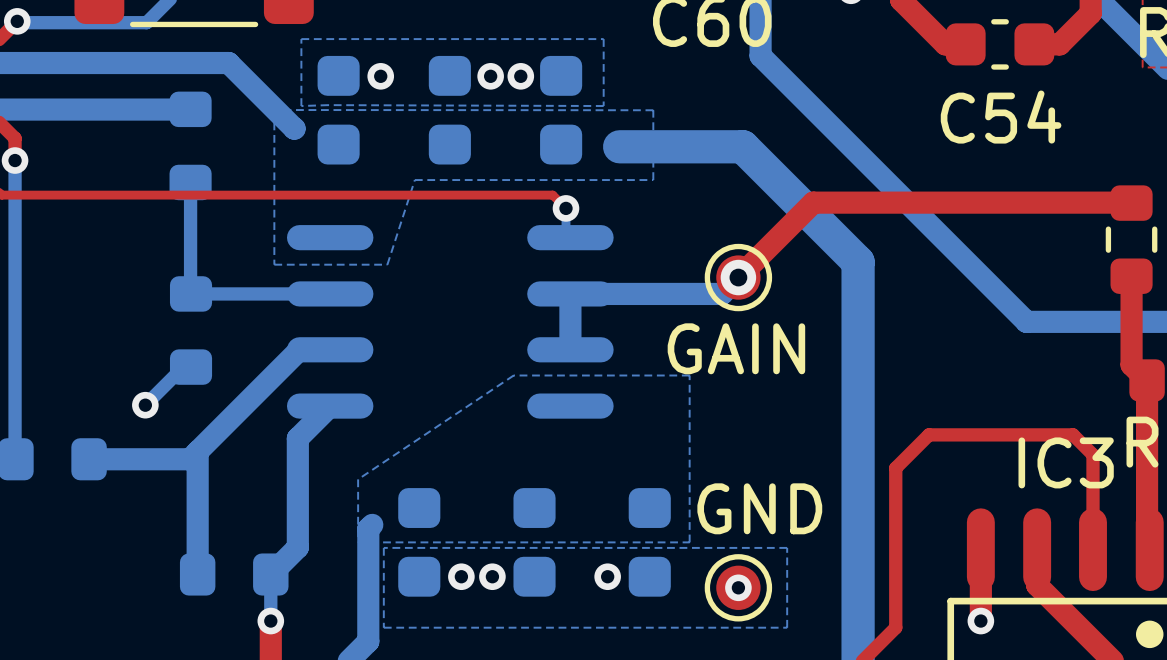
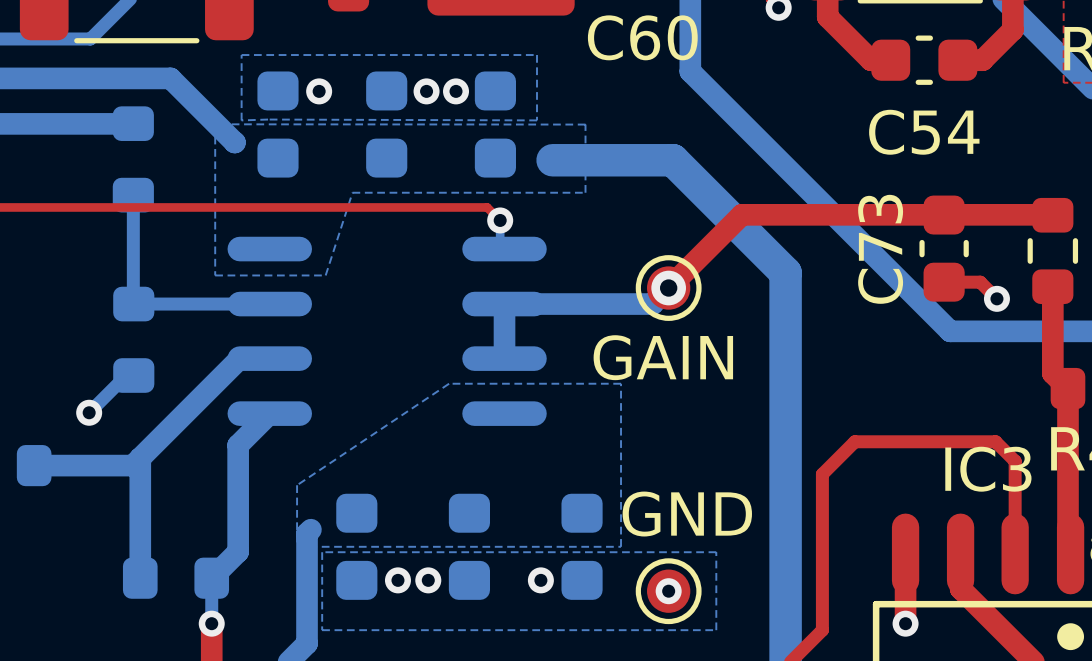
C73: none -> (944, 248)
top track: none -> (944, 282) (980, 282) (996, 298)
via: none -> (996, 298)

